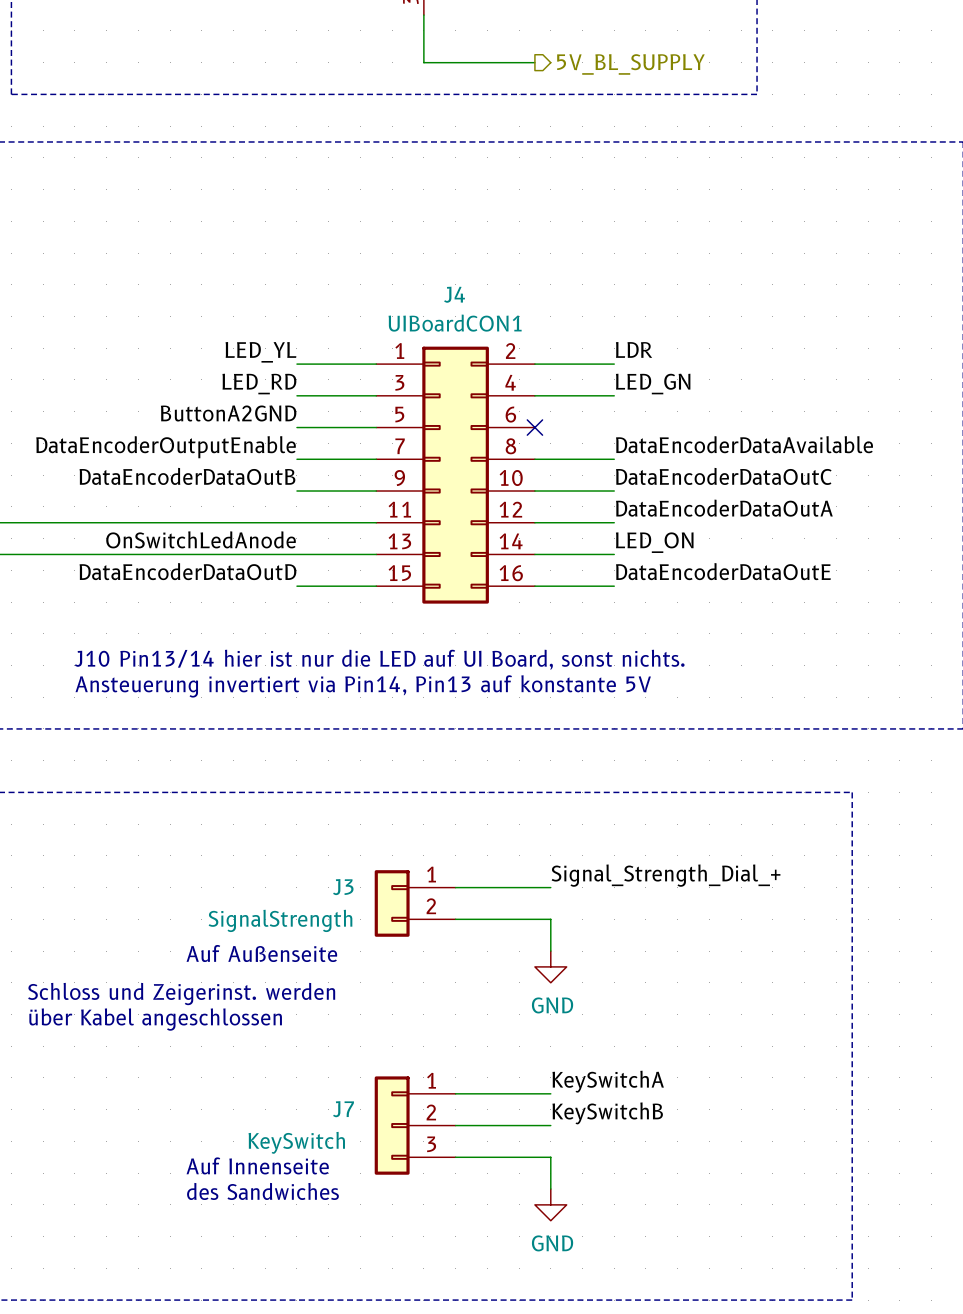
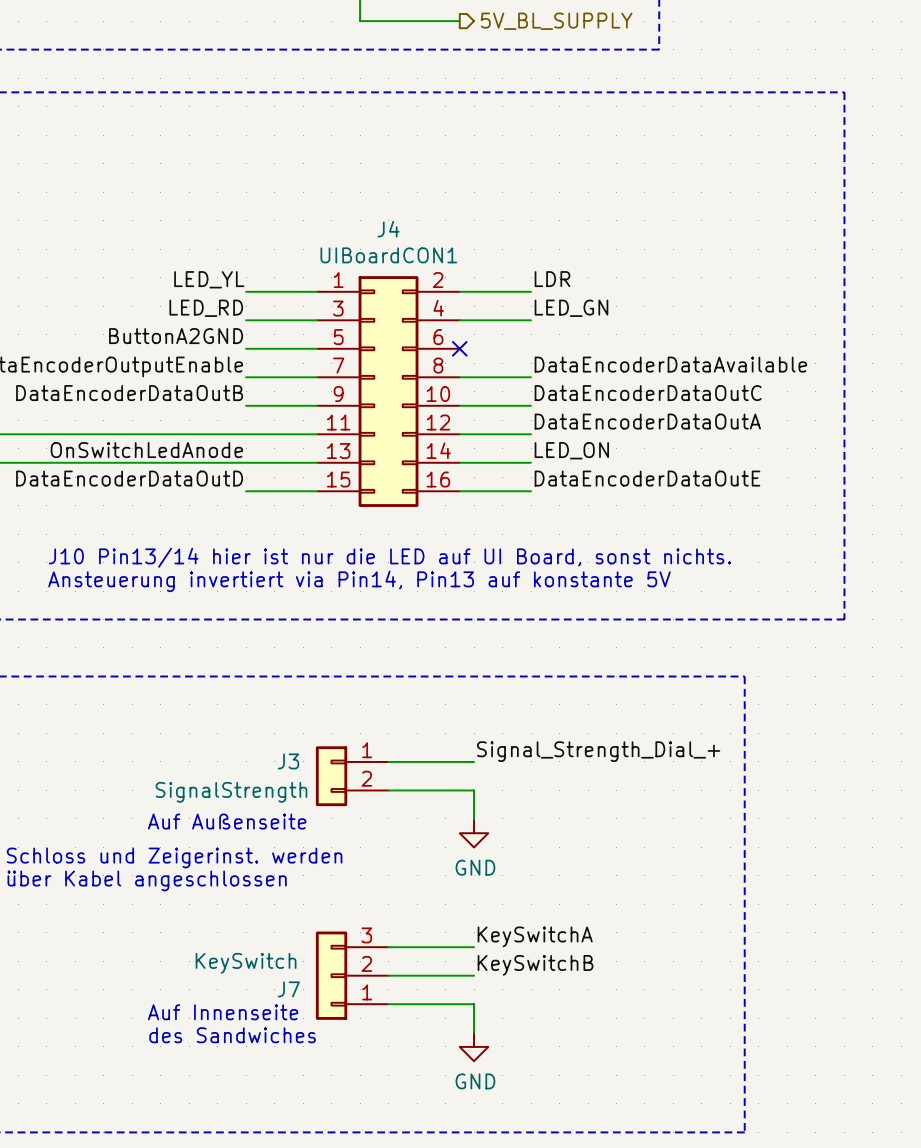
J7 flip: as is (392, 1125) -> up-down (331, 975)

